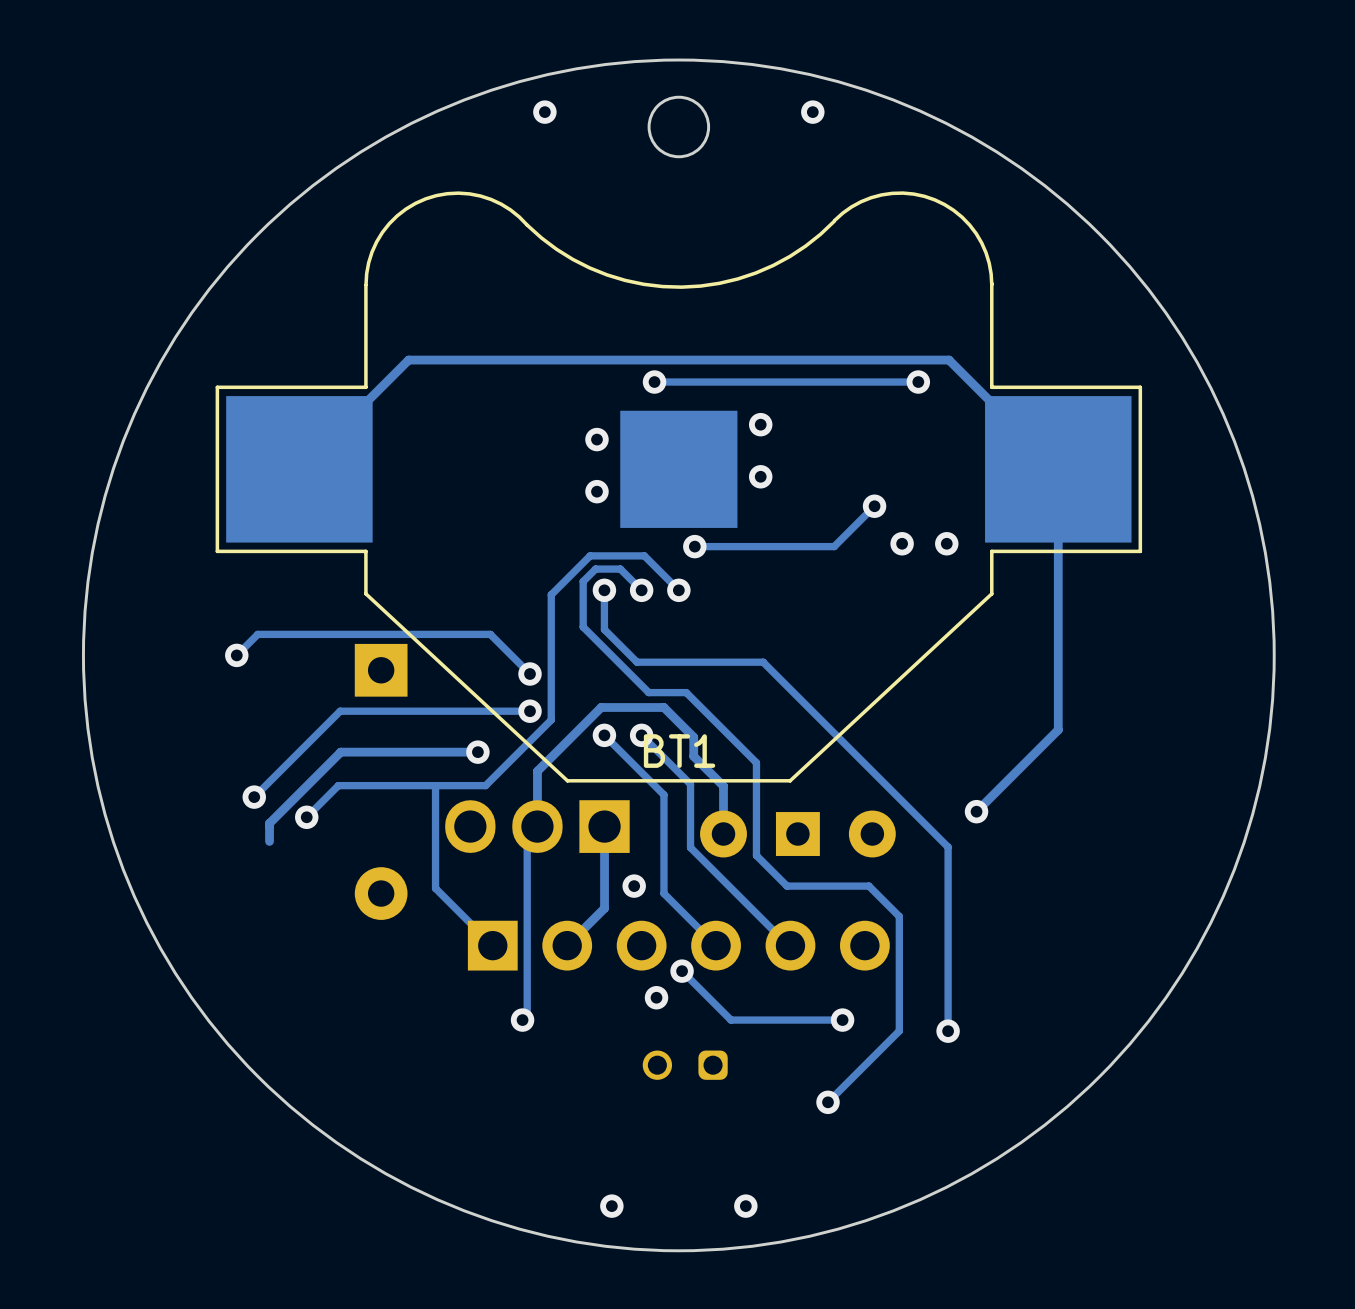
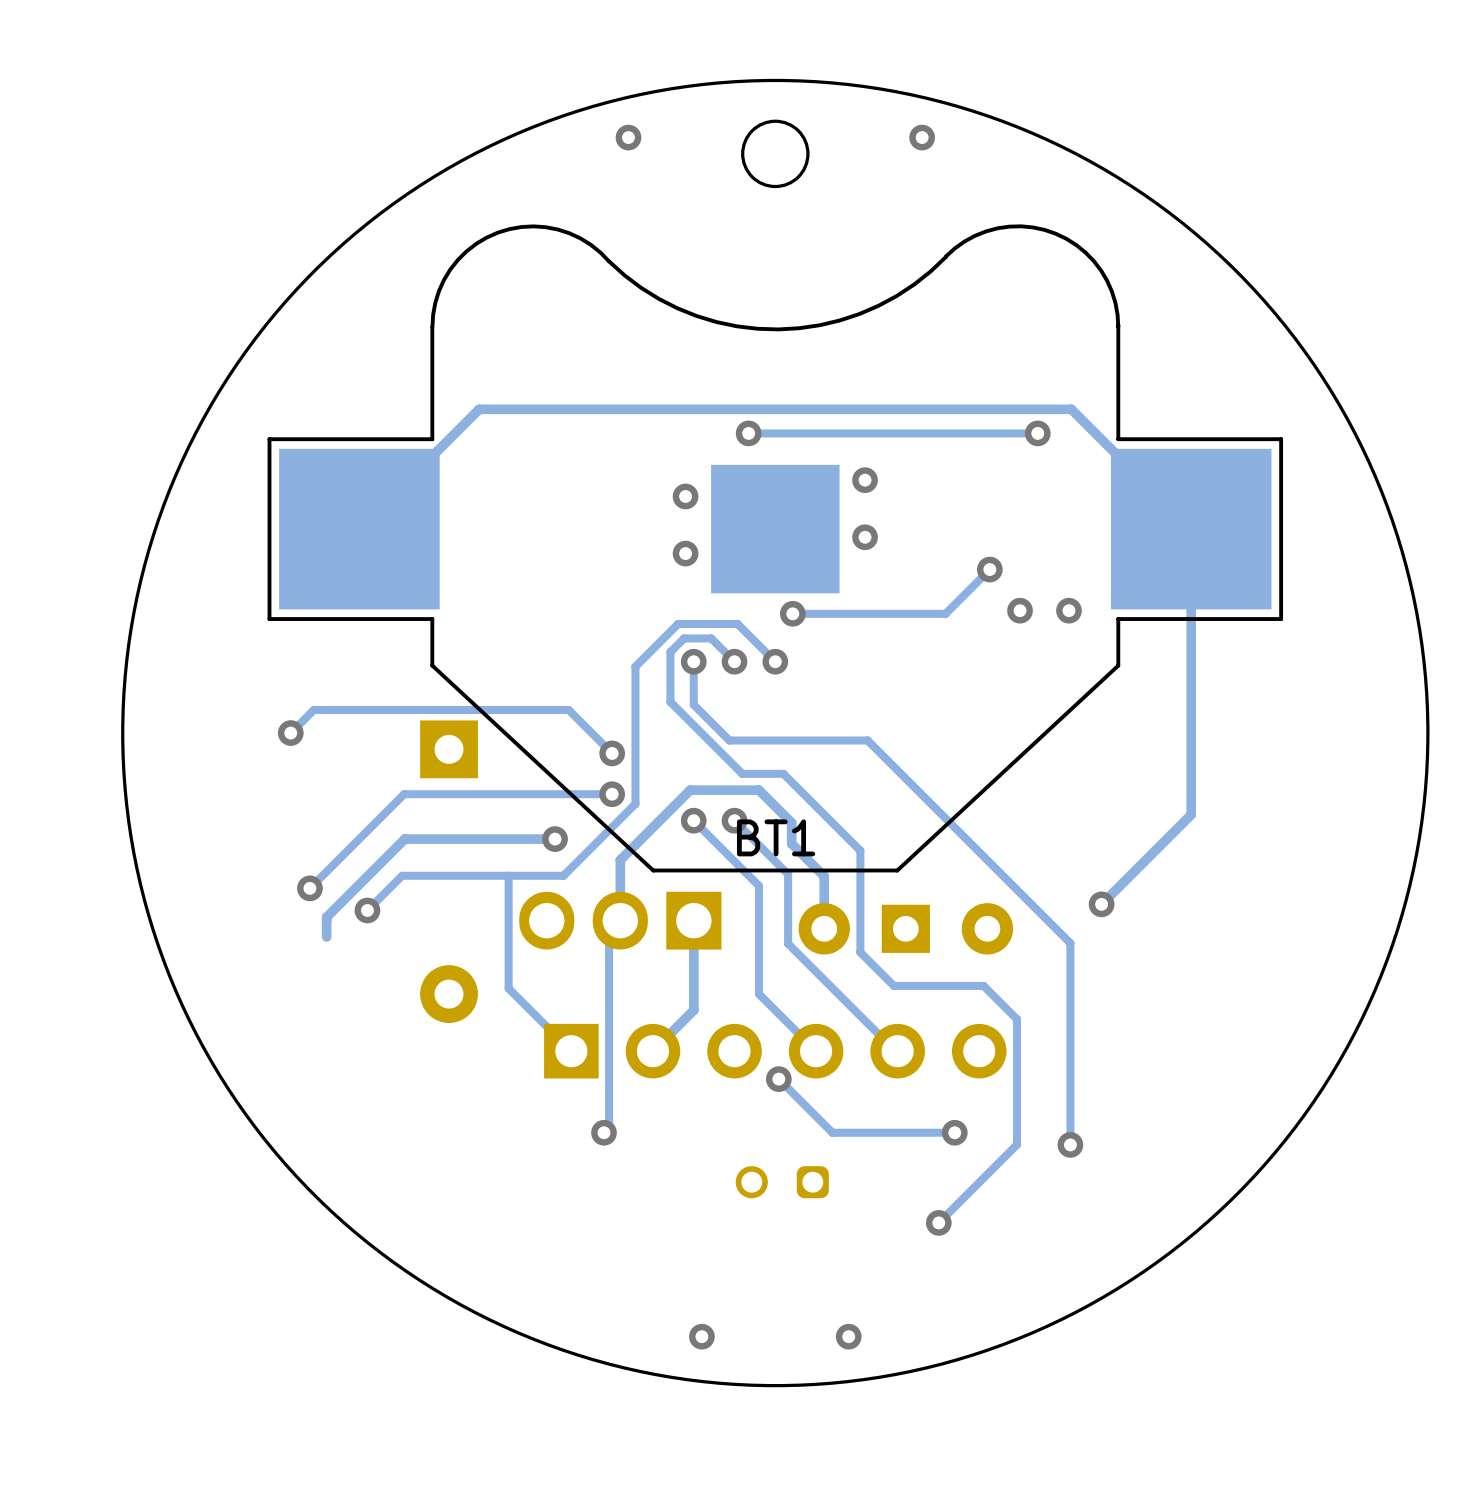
via: (634, 886) -> none
via: (656, 997) -> none

